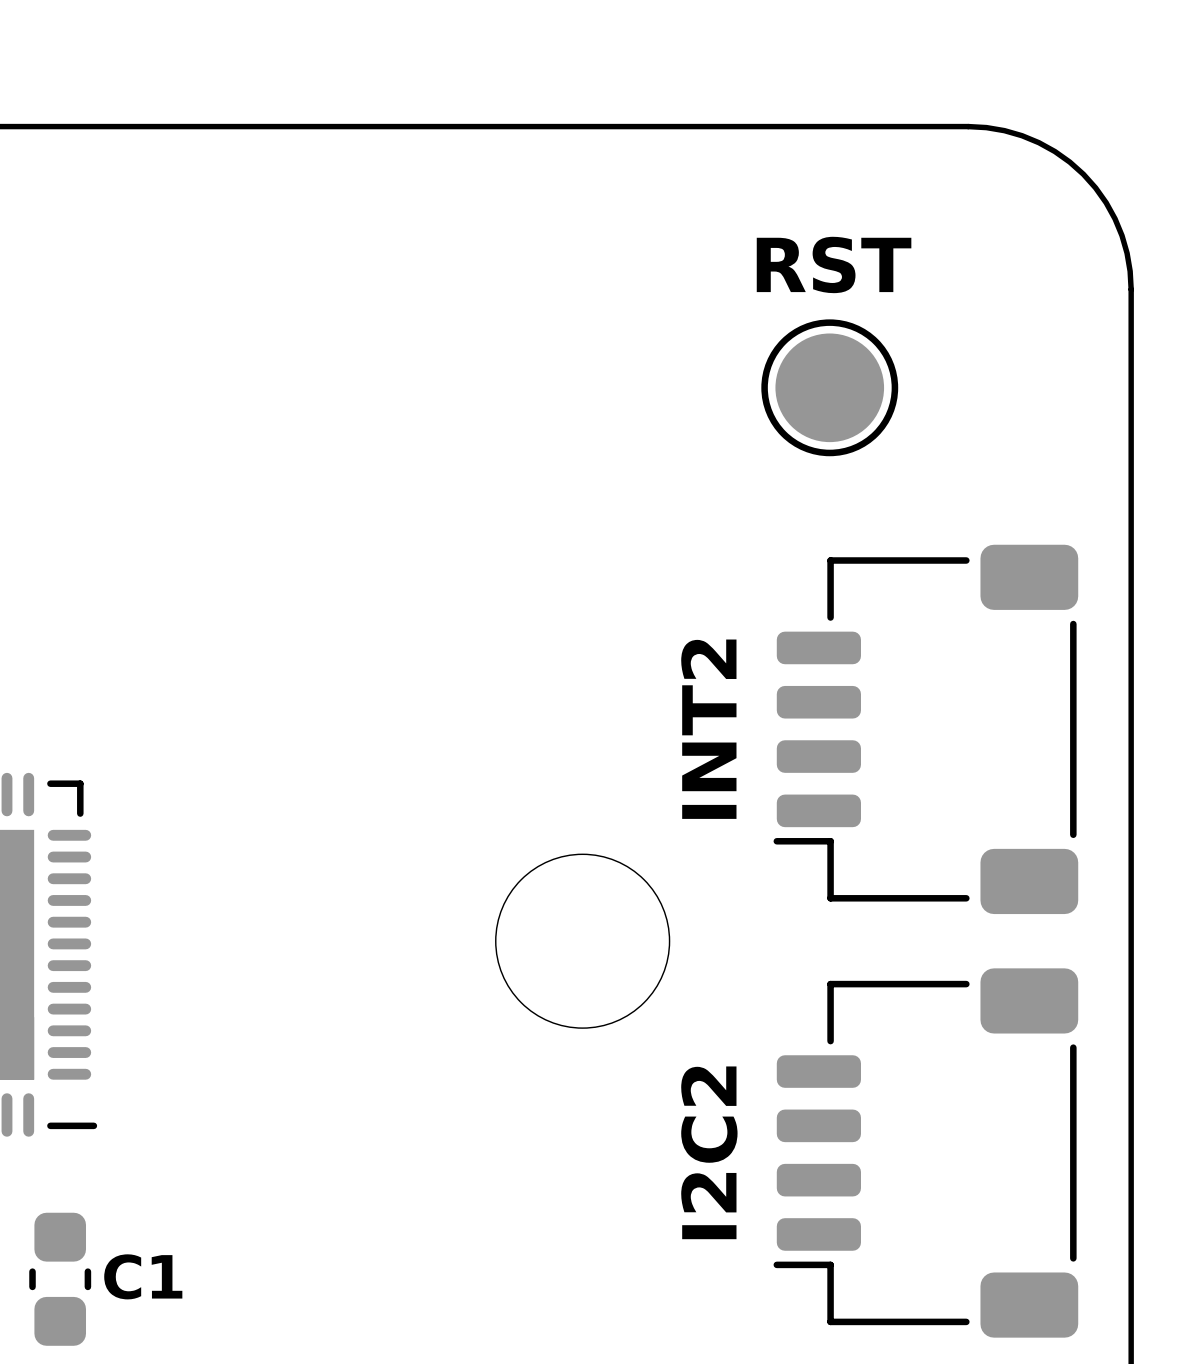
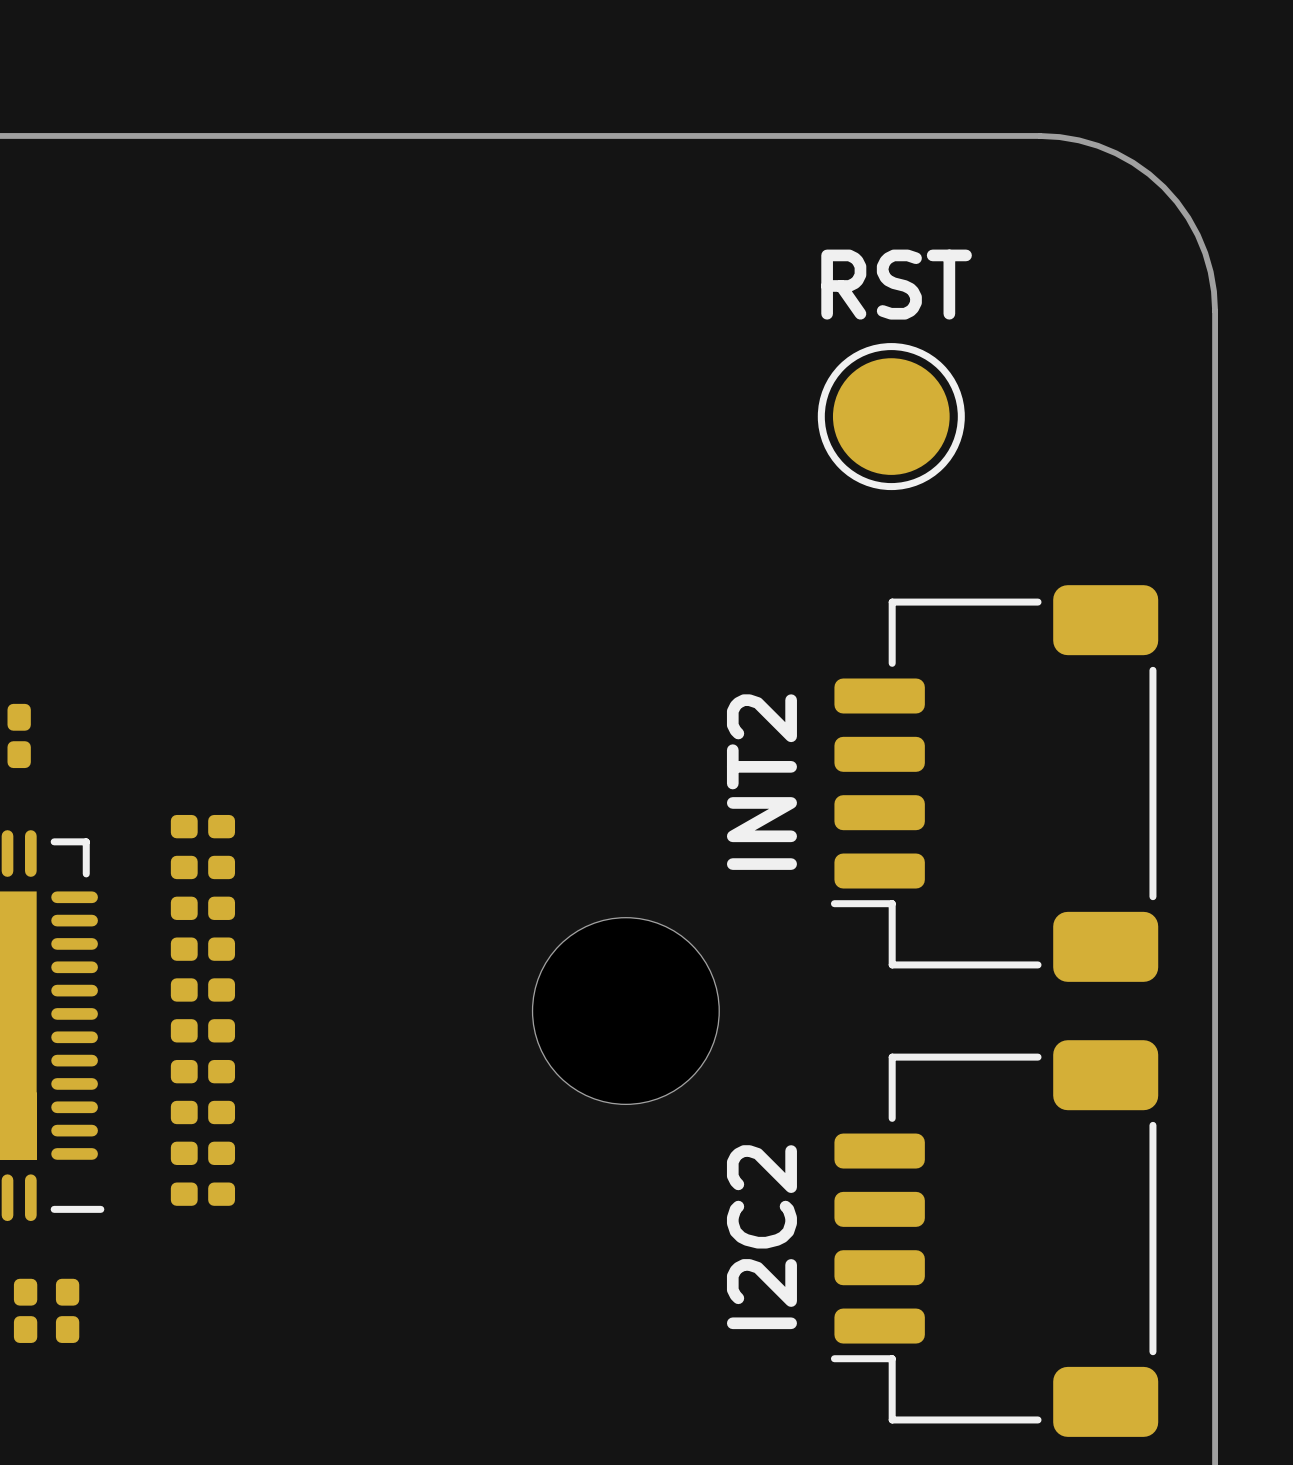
part: none -> (19, 735)
part: none -> (202, 826)
part: none -> (202, 867)
part: none -> (202, 908)
part: none -> (202, 949)
part: none -> (202, 989)
part: none -> (202, 1030)
part: none -> (202, 1071)
part: none -> (202, 1112)
part: none -> (202, 1153)
part: none -> (202, 1194)
part: none -> (25, 1310)
part: none -> (67, 1310)
C1: (60, 1279) -> none

